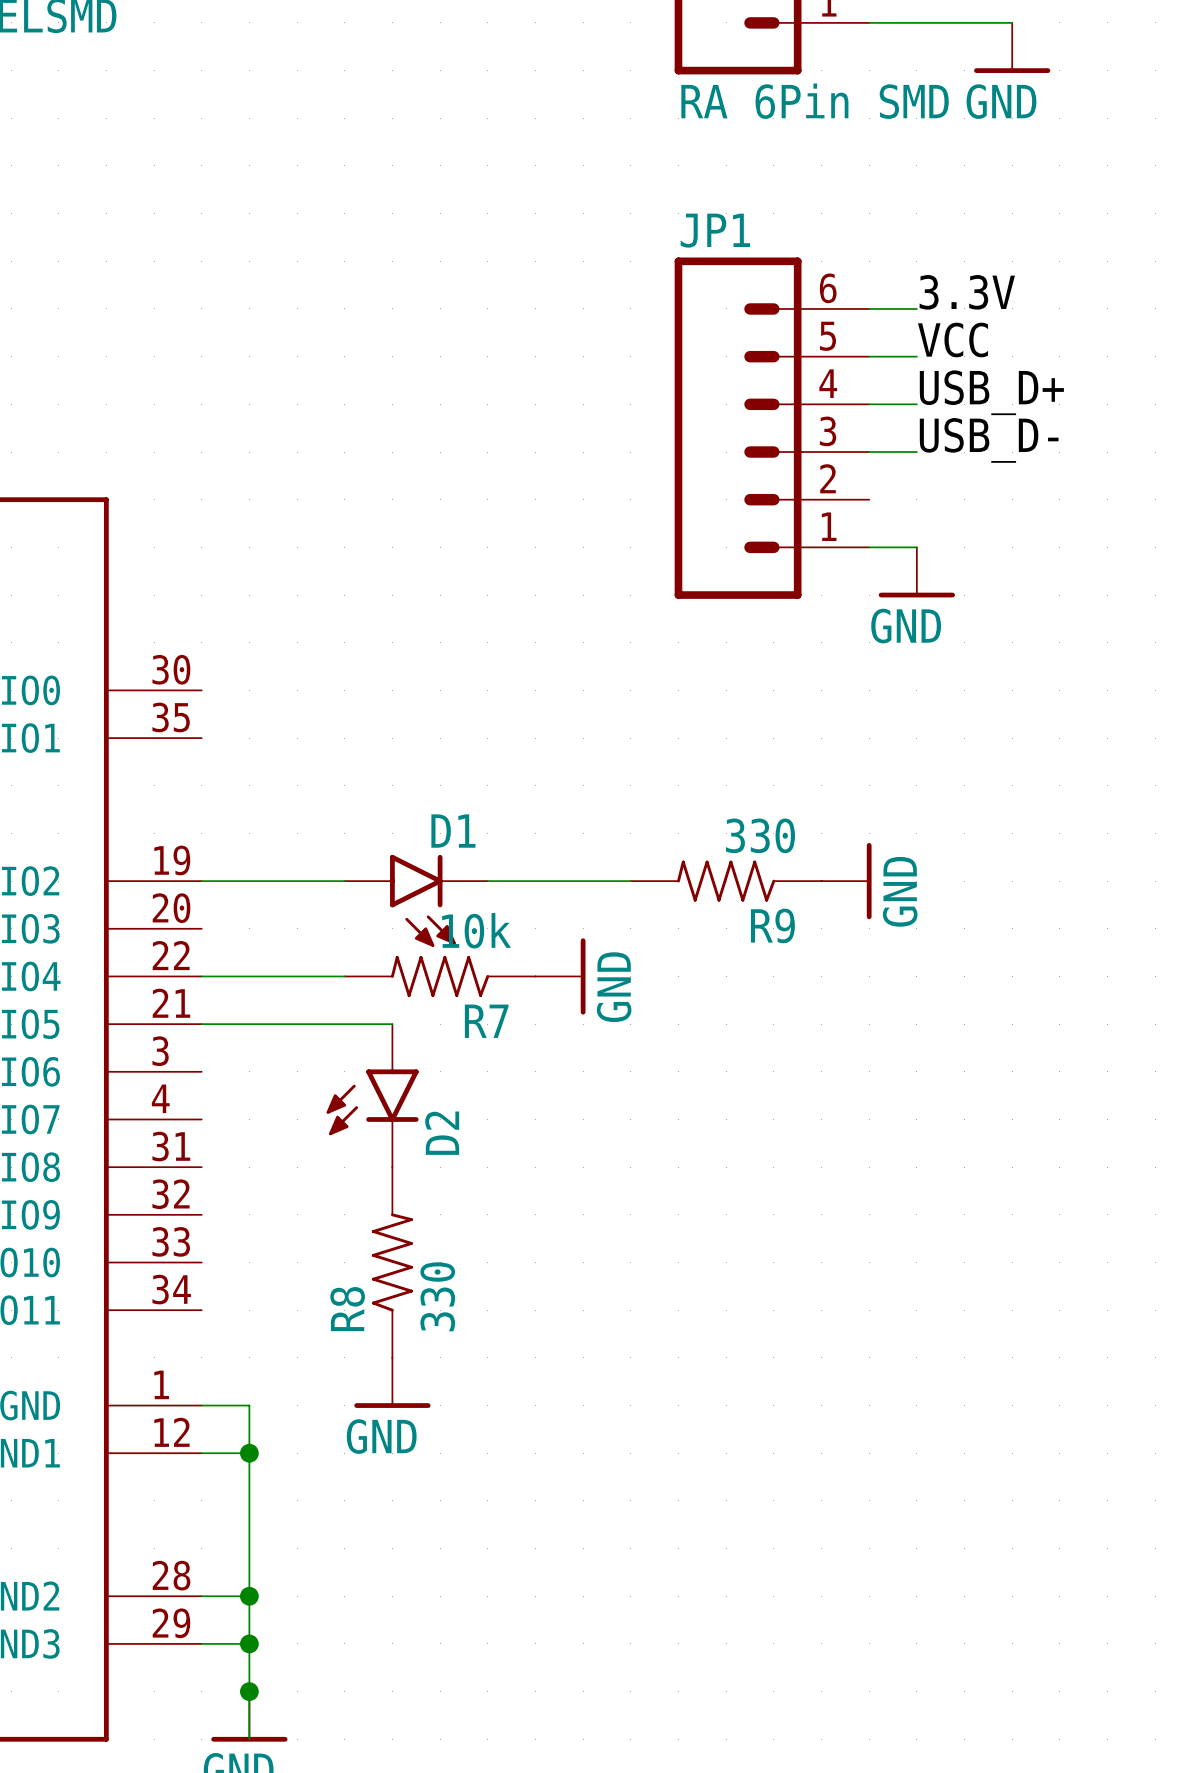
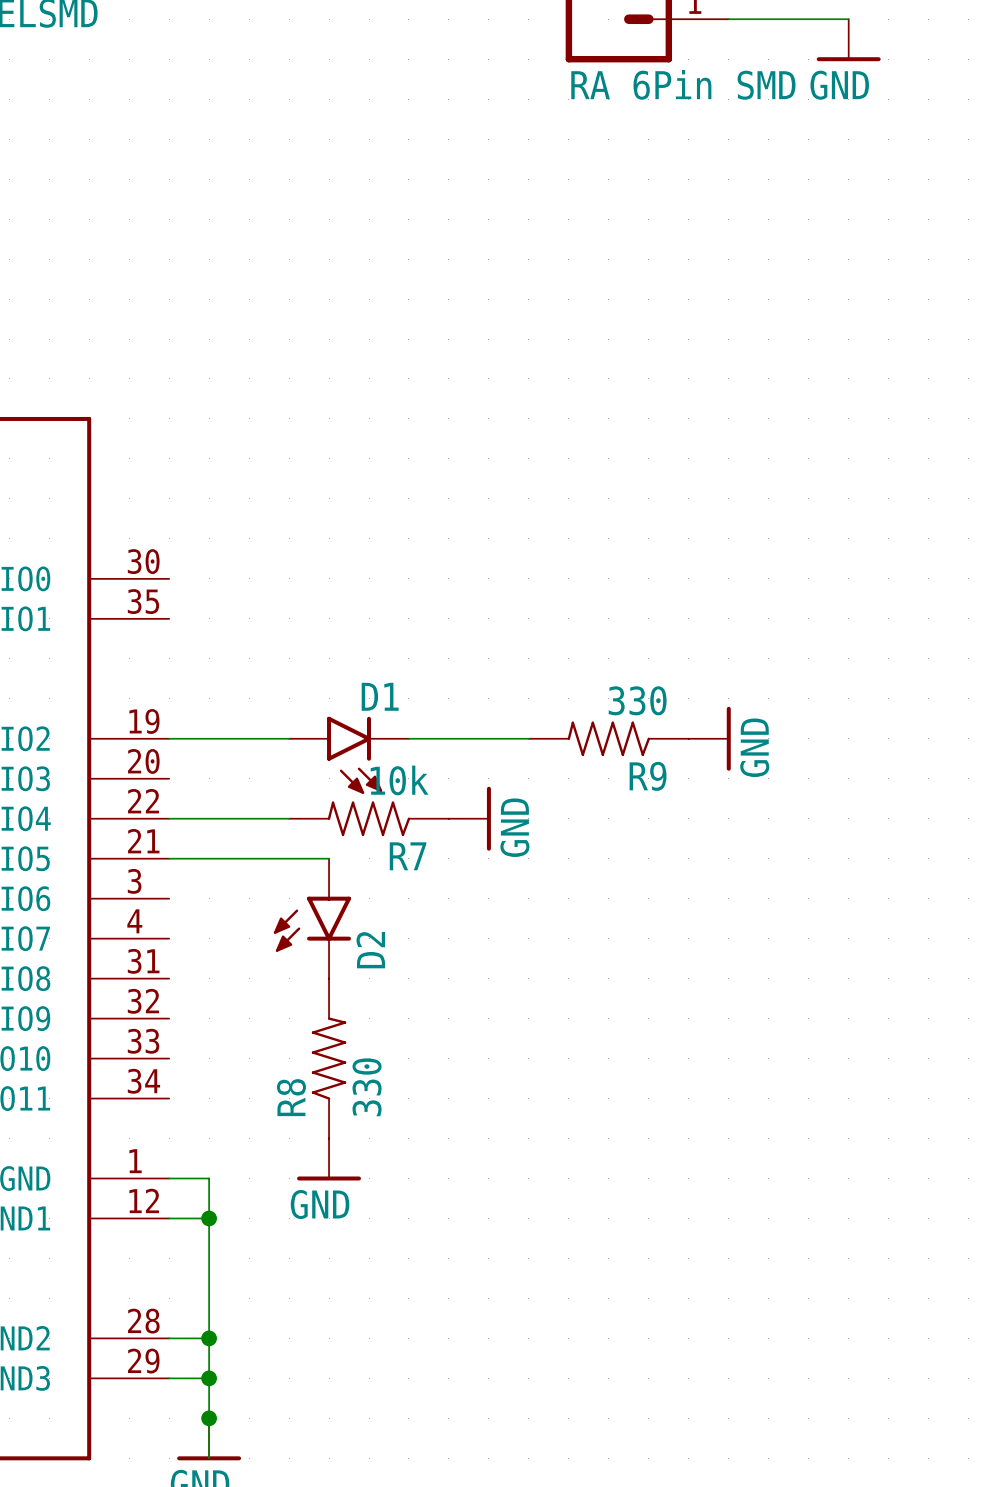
label: 3.3V (967, 292) -> none
wire: (869, 308) (916, 308) -> none
label: VCC (953, 340) -> none
wire: (869, 356) (916, 356) -> none
label: USB_D+ (991, 392) -> none
wire: (869, 404) (916, 404) -> none
JP1: (771, 428) -> none
label: USB_D- (989, 440) -> none
wire: (869, 452) (916, 452) -> none
wire: (869, 547) (916, 547) -> none
power symbol: GND (916, 572) -> none

